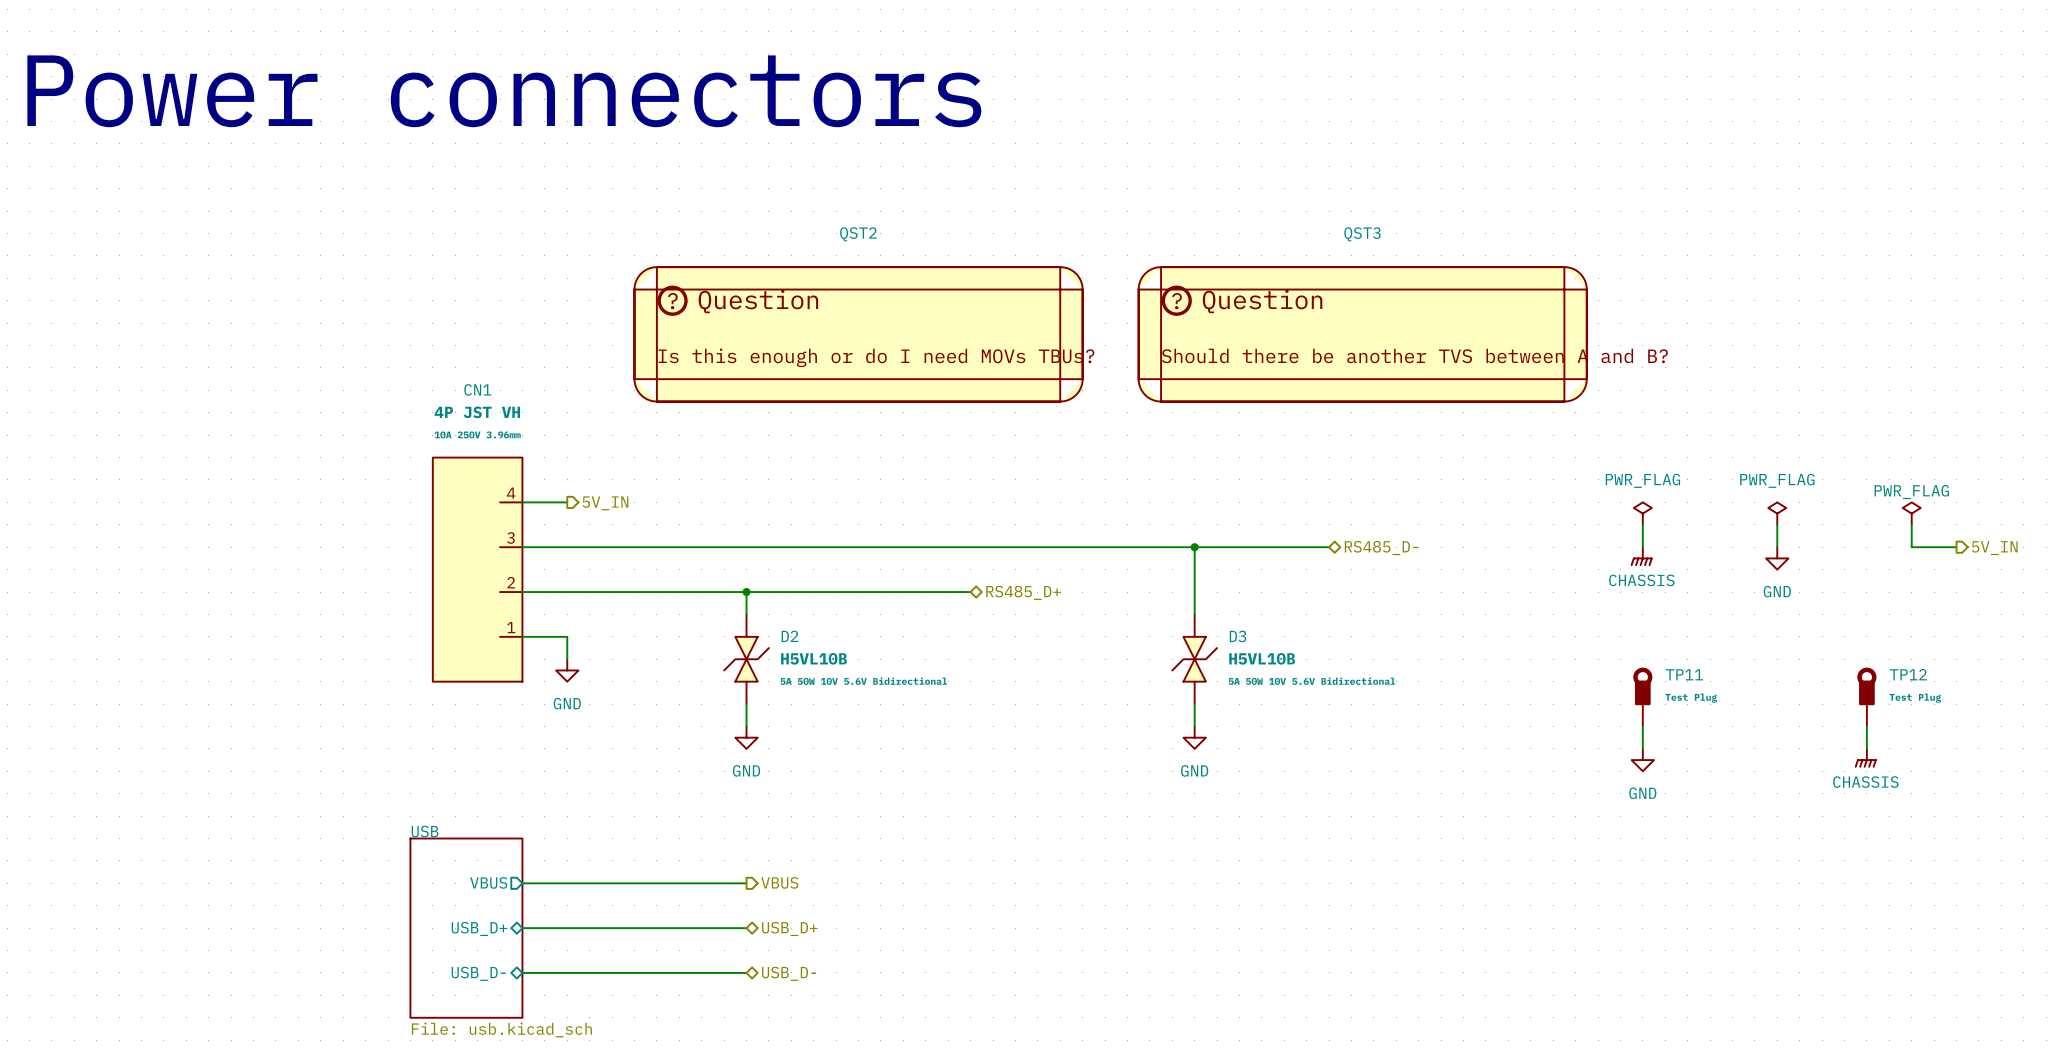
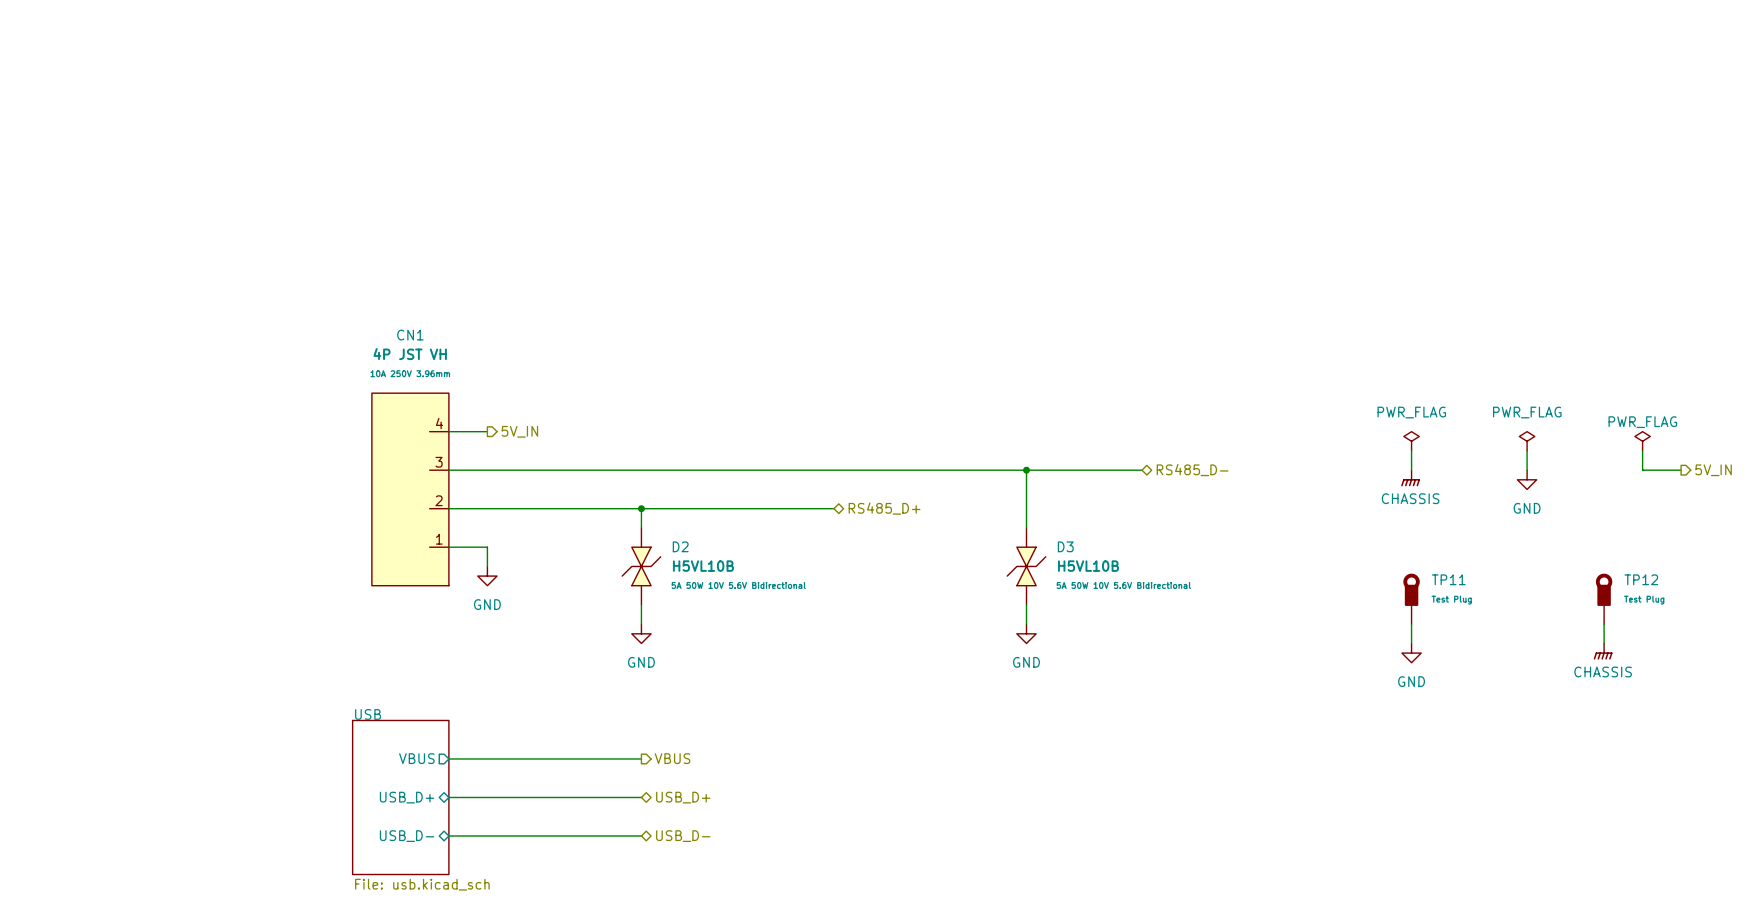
text: Power connectors (504, 91) -> none
QST2: (858, 334) -> none
QST3: (1362, 334) -> none

